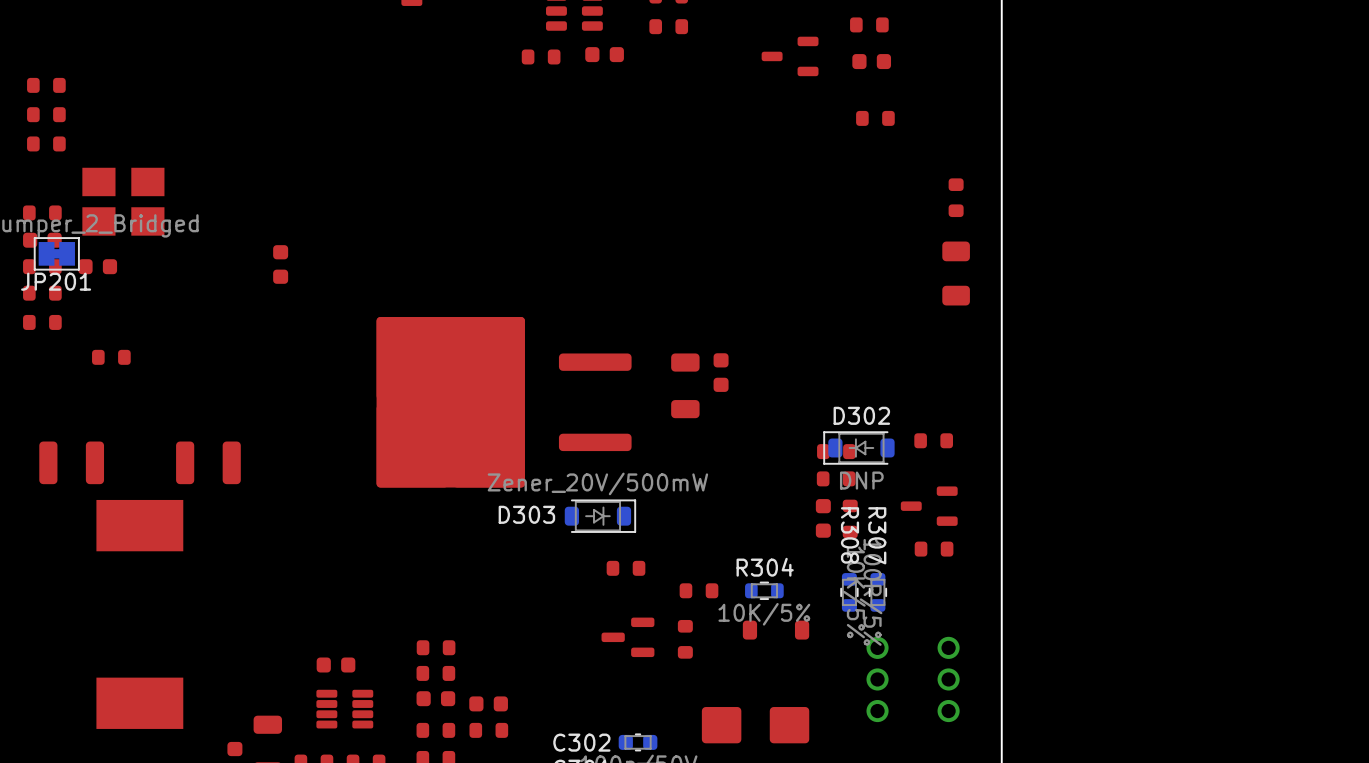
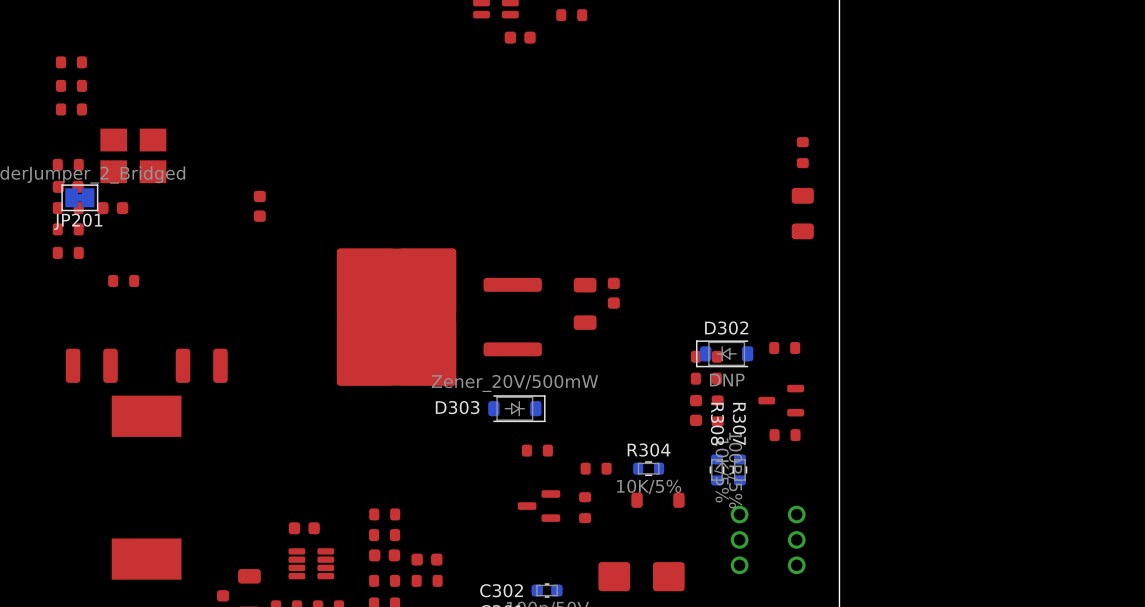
part: (869, 24) -> none
part: (541, 56) -> none
part: (790, 56) -> none
part: (871, 61) -> none
part: (875, 118) -> none

